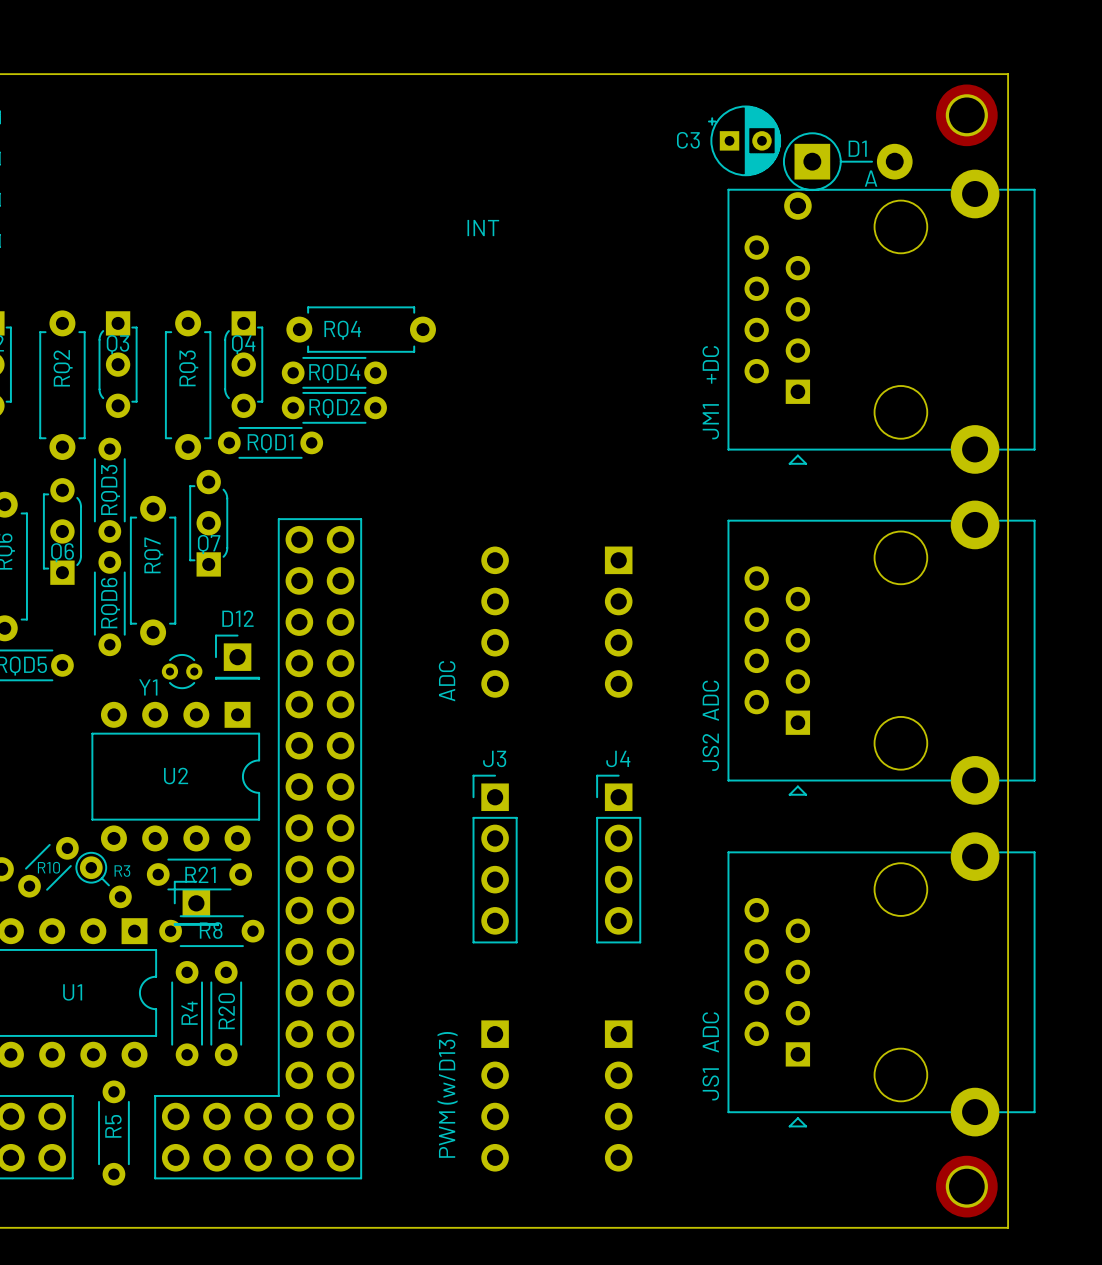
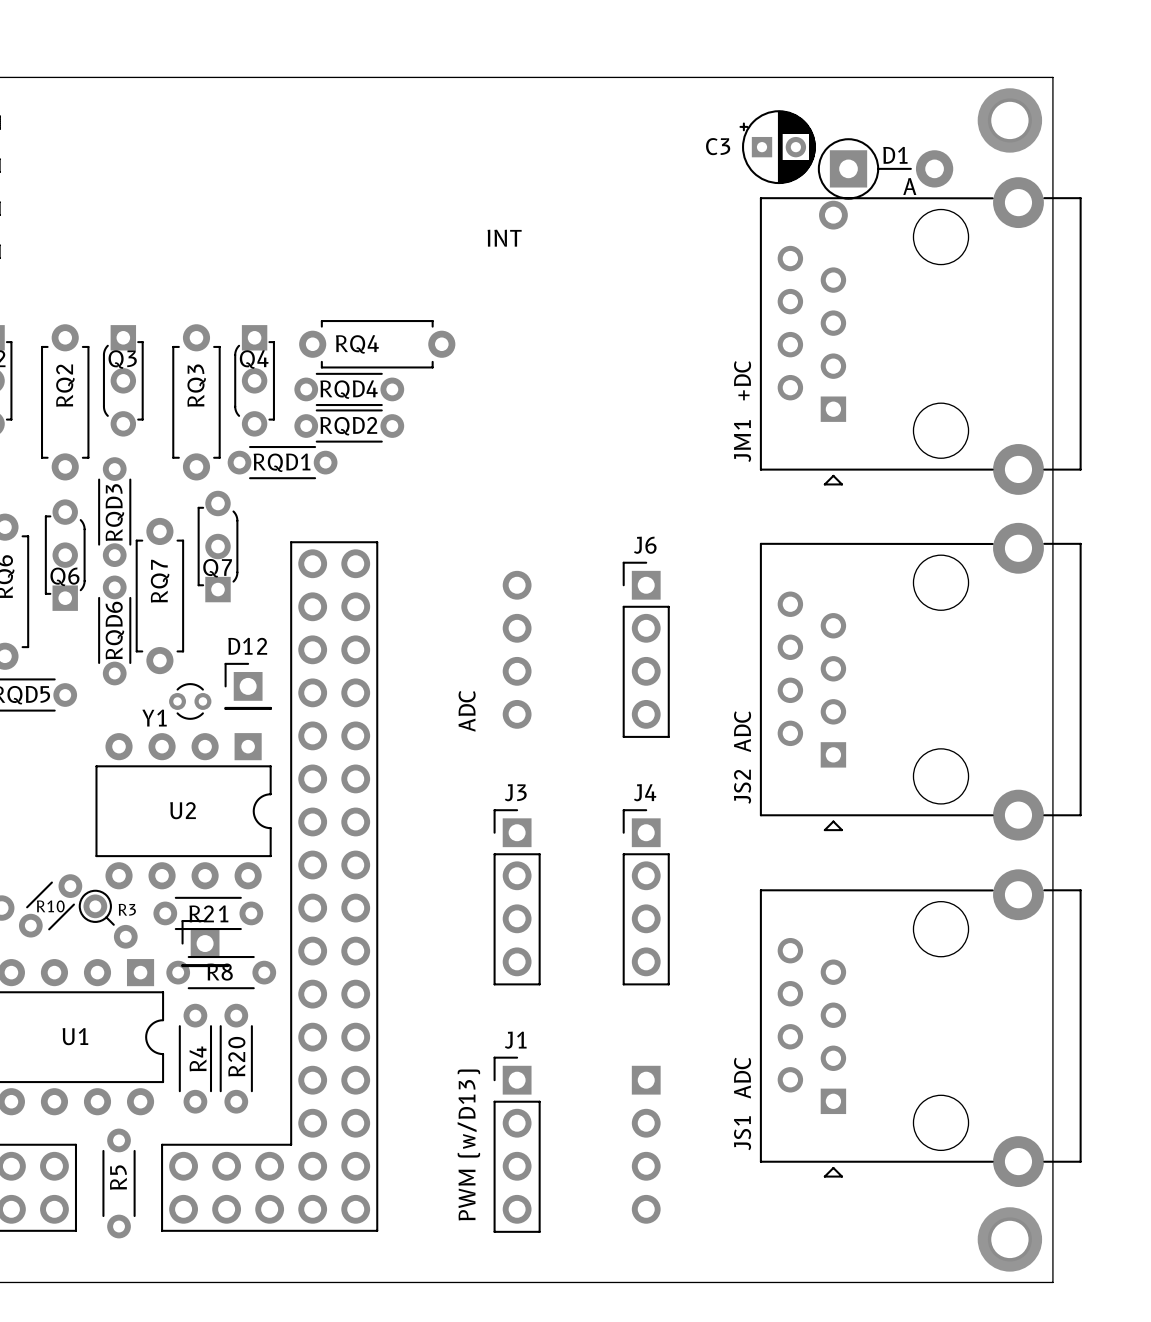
J6 side: bottom (618, 622) -> top (646, 649)
J1 side: bottom (495, 1095) -> top (517, 1144)

